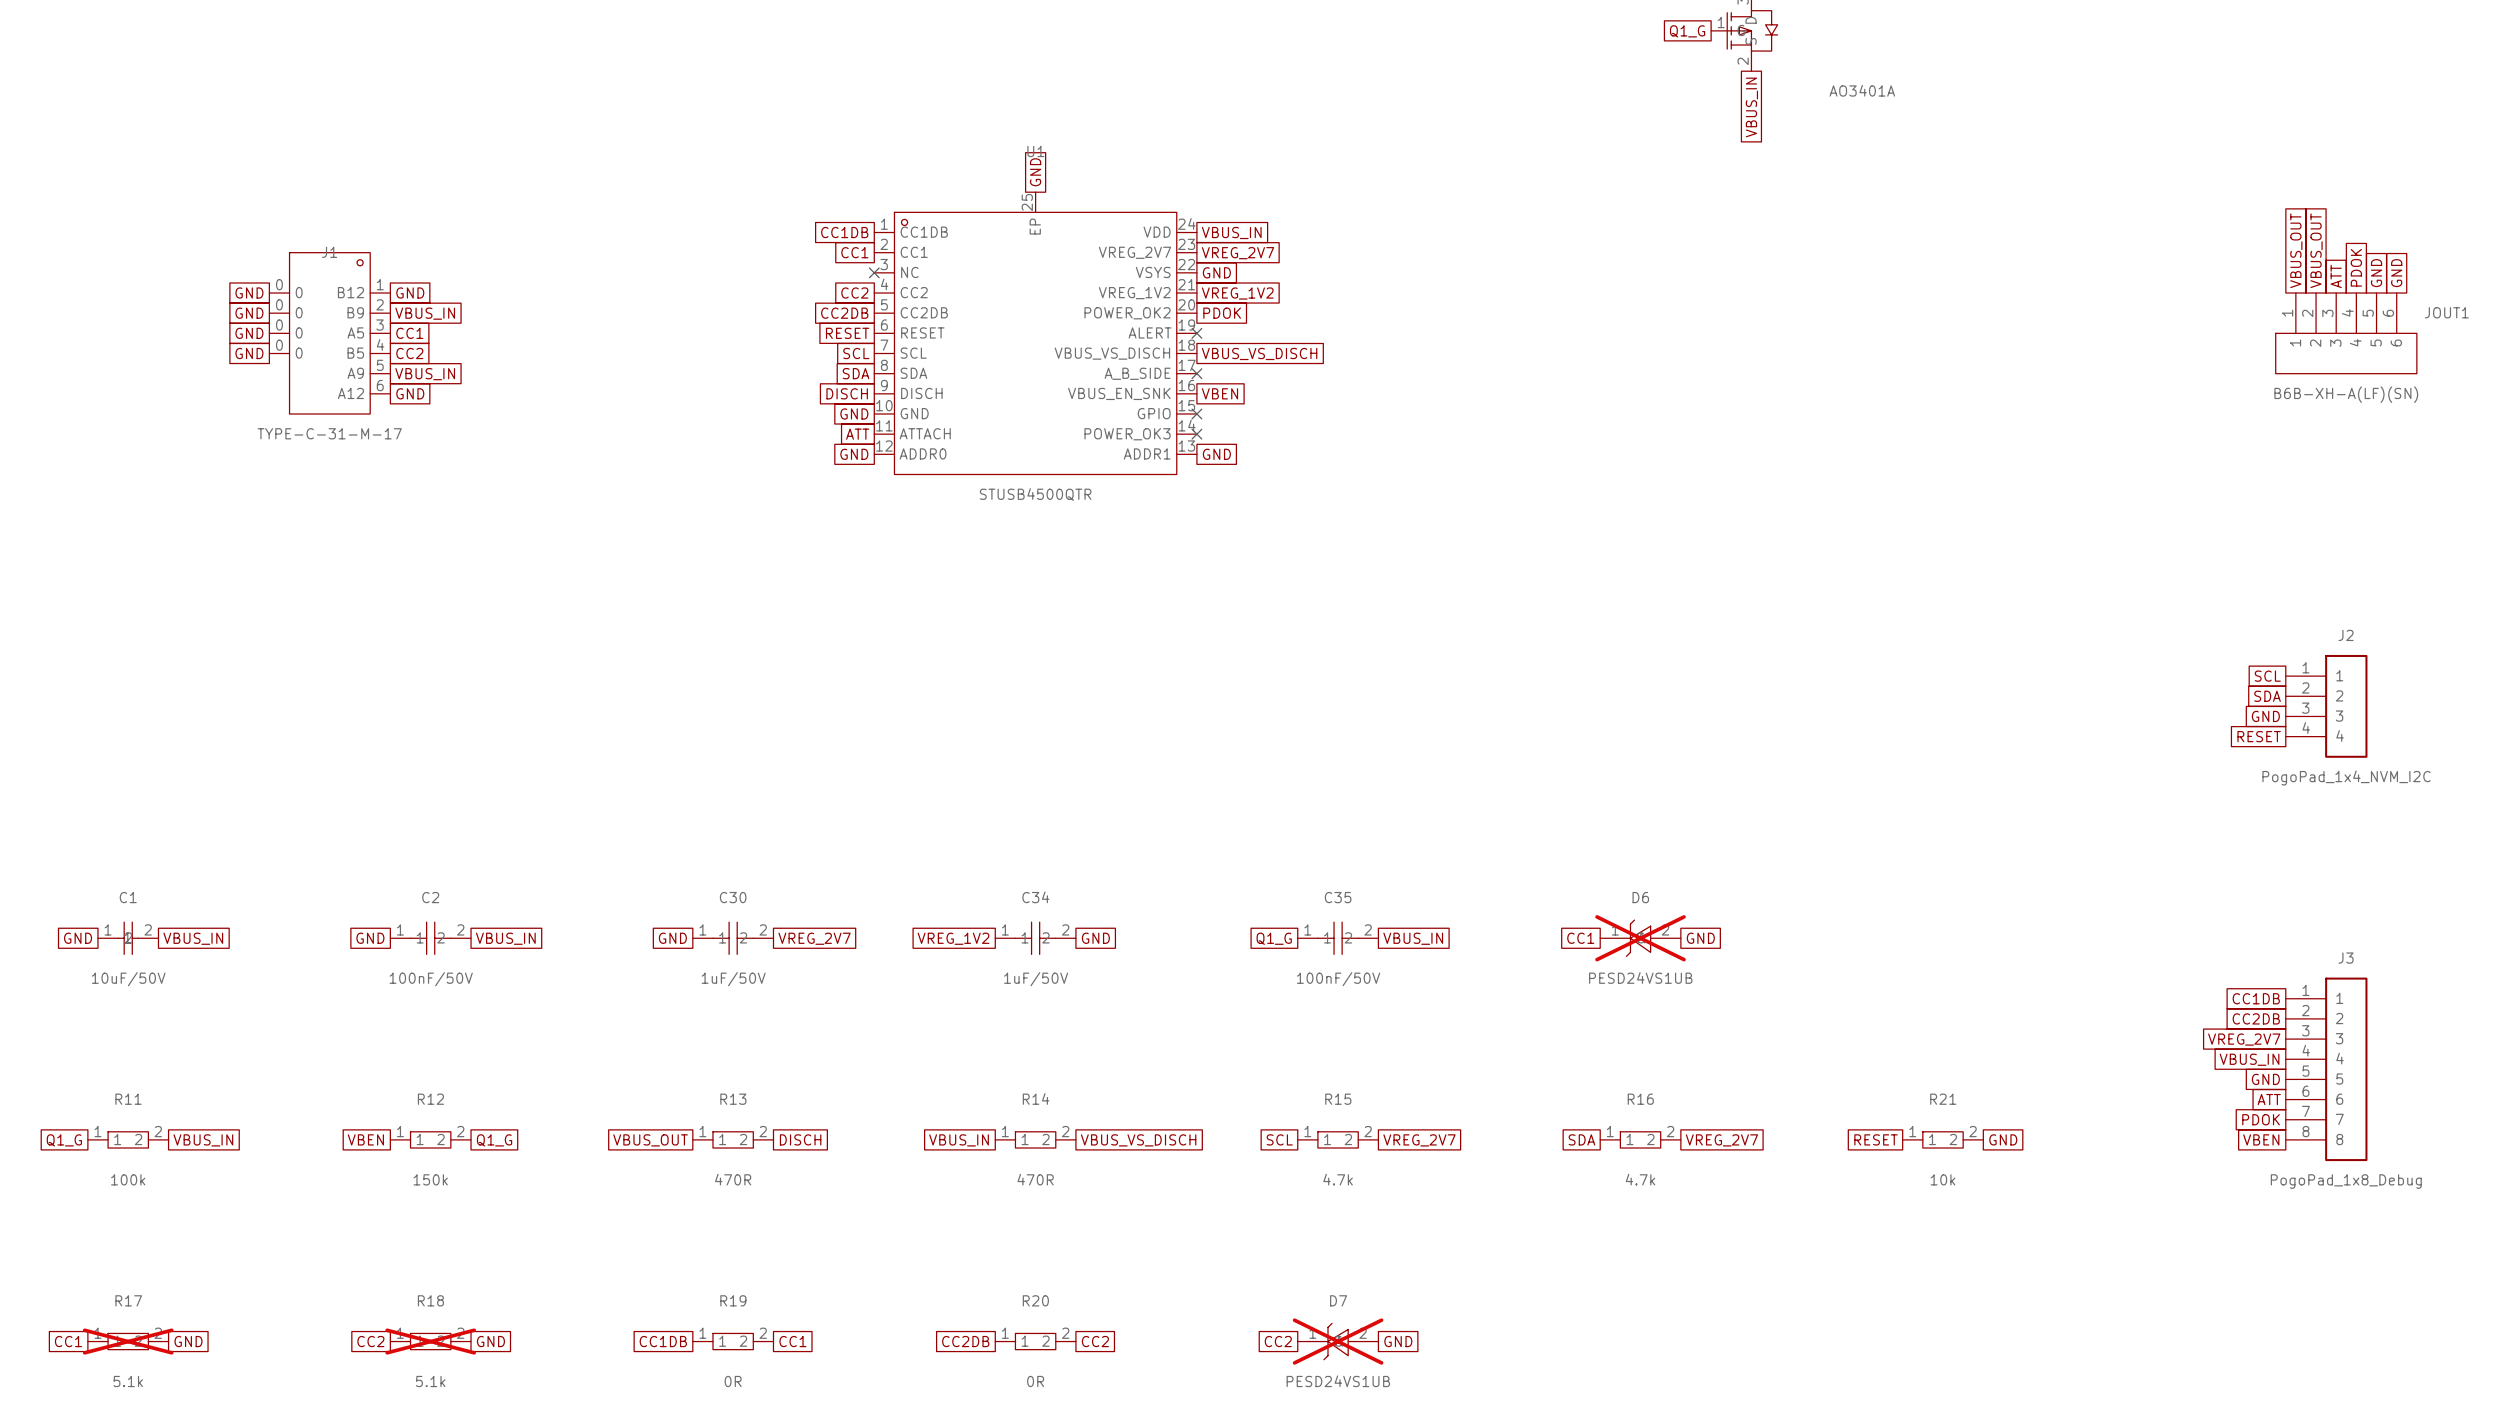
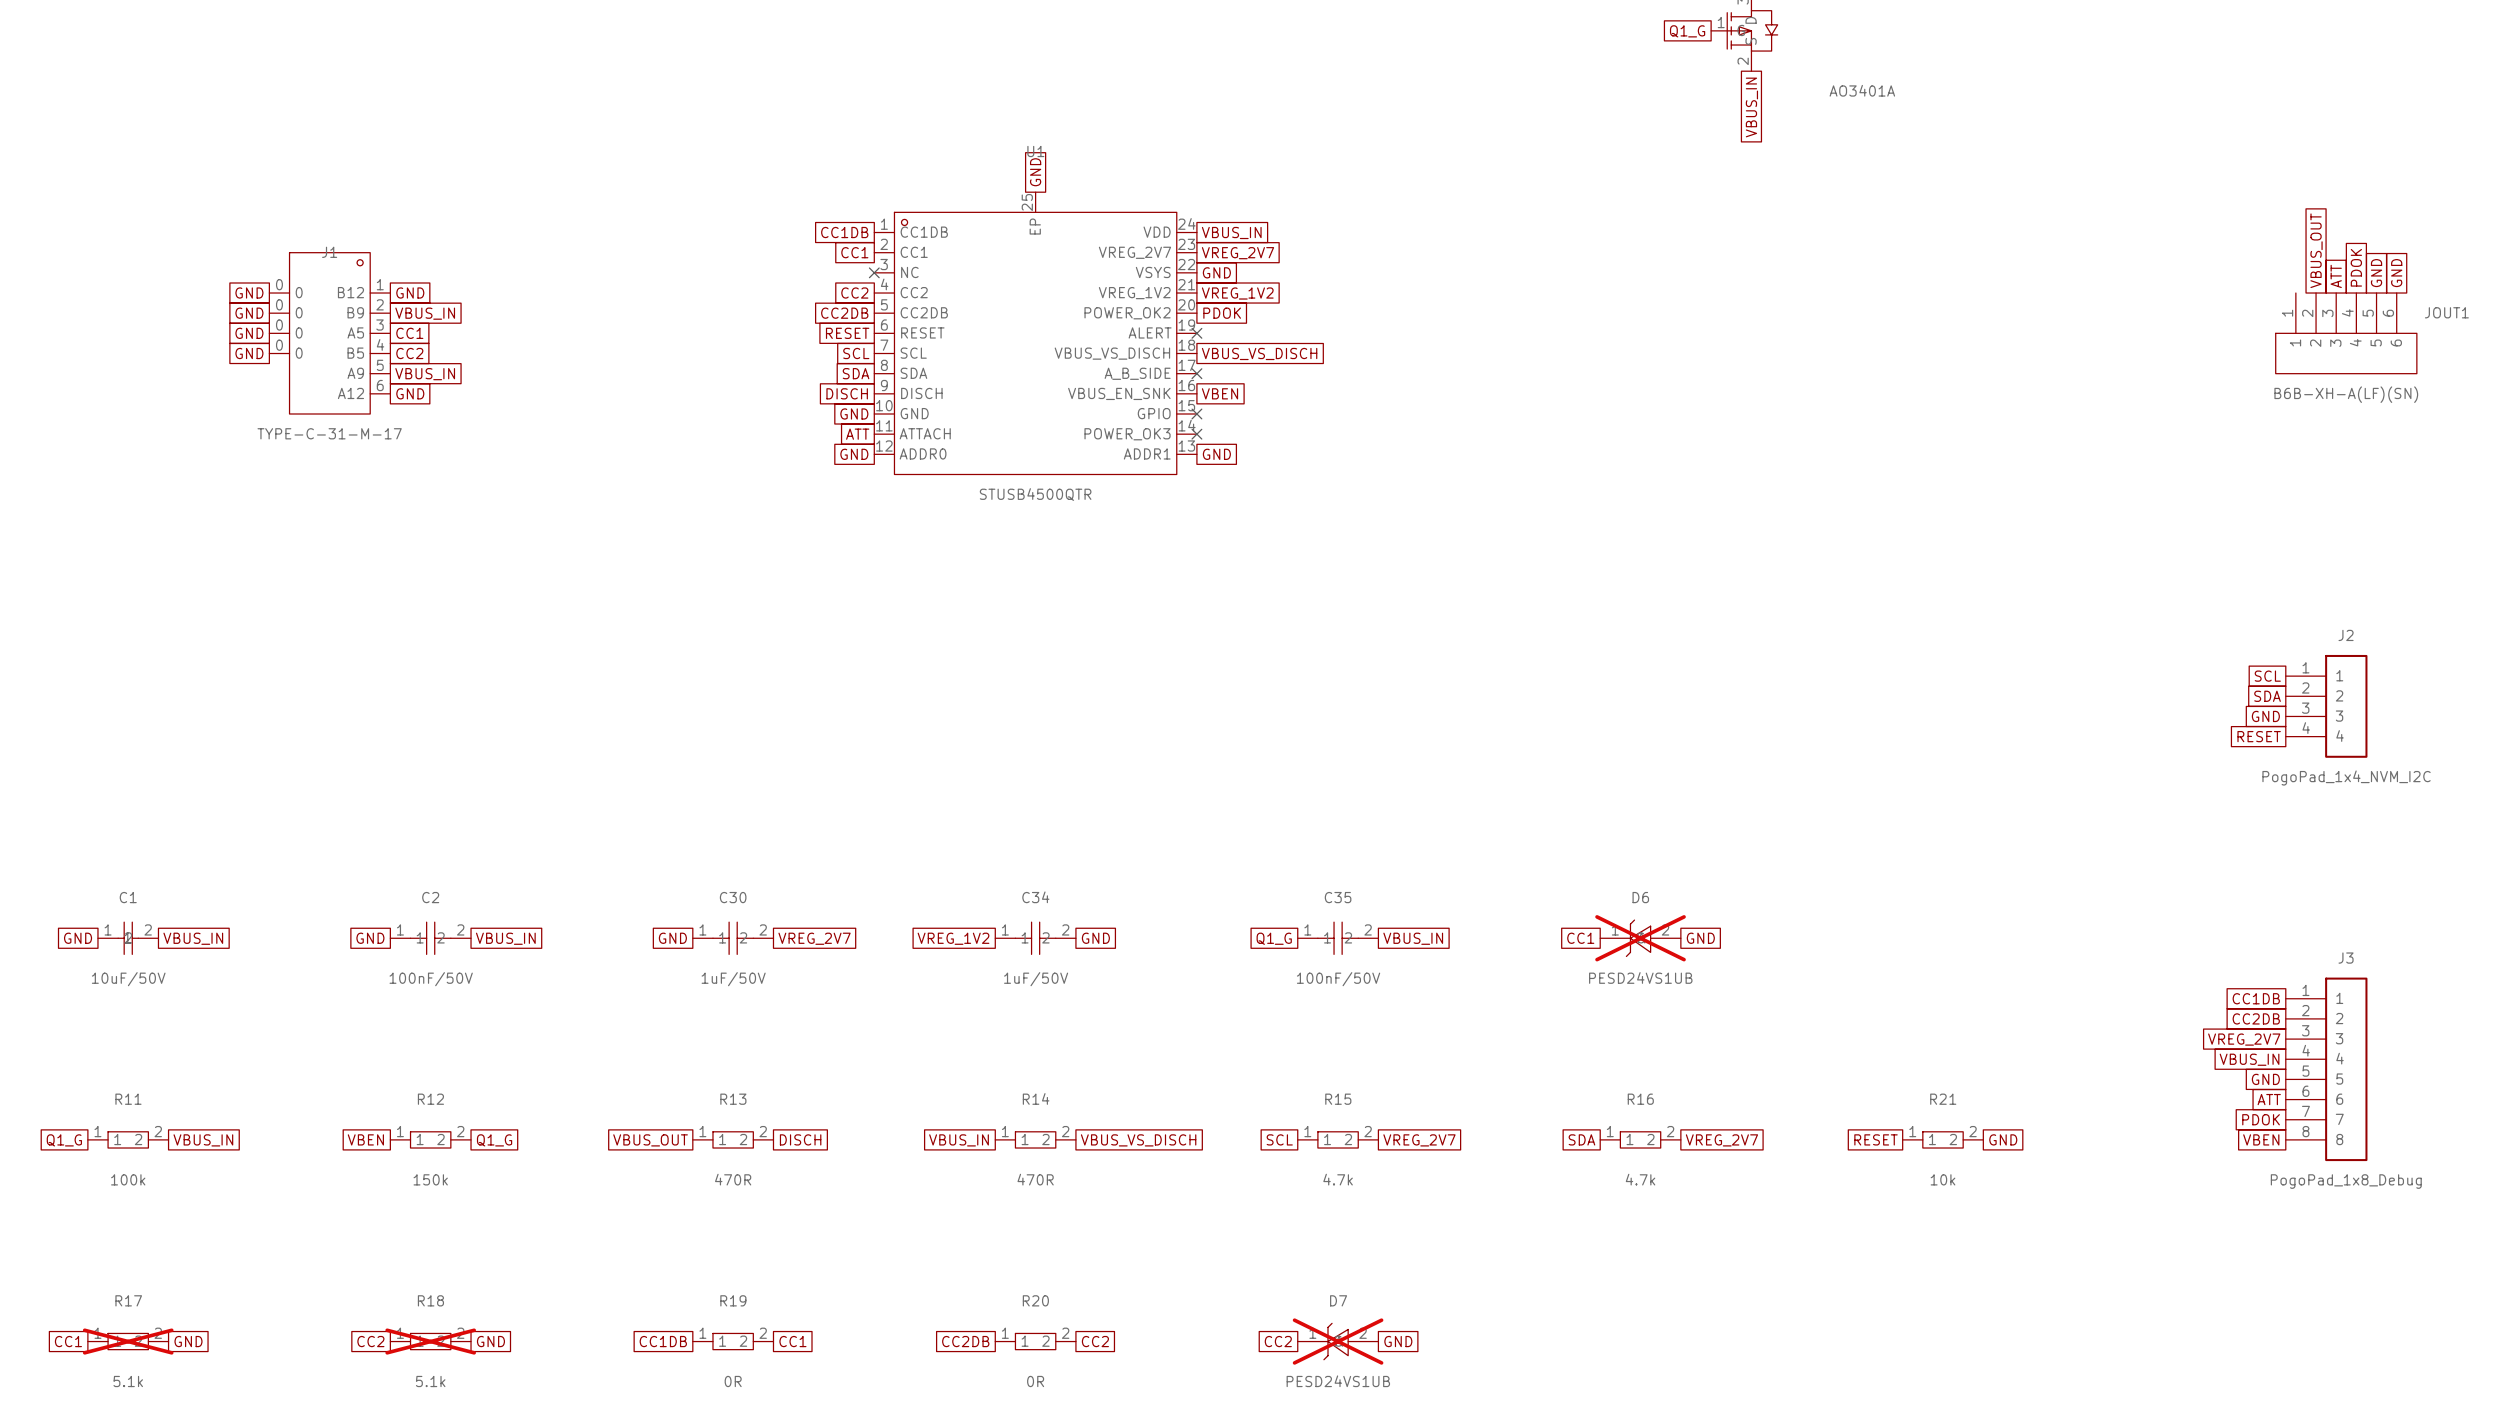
global label: VBUS_OUT (2296, 250) -> none

